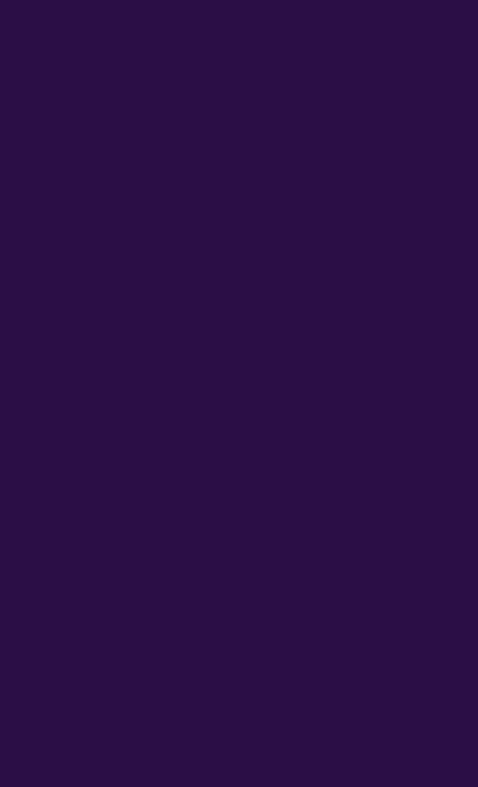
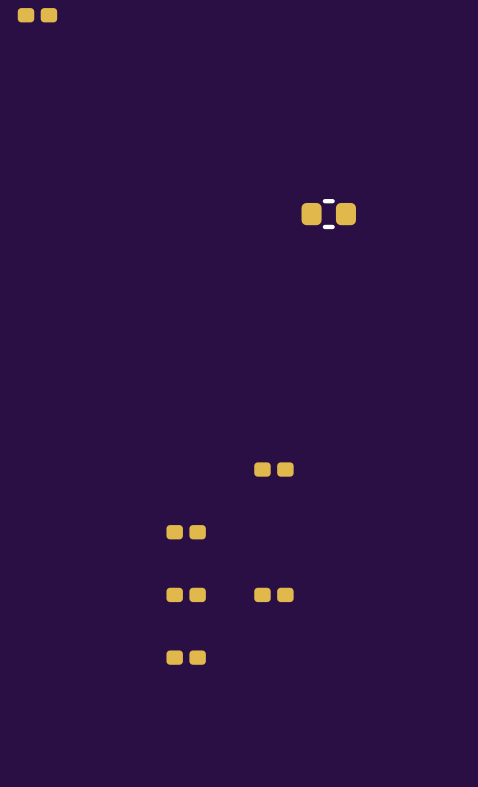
part: none -> (37, 15)
part: none -> (328, 214)
part: none -> (273, 469)
part: none -> (186, 532)
part: none -> (186, 594)
part: none -> (273, 594)
part: none -> (186, 657)

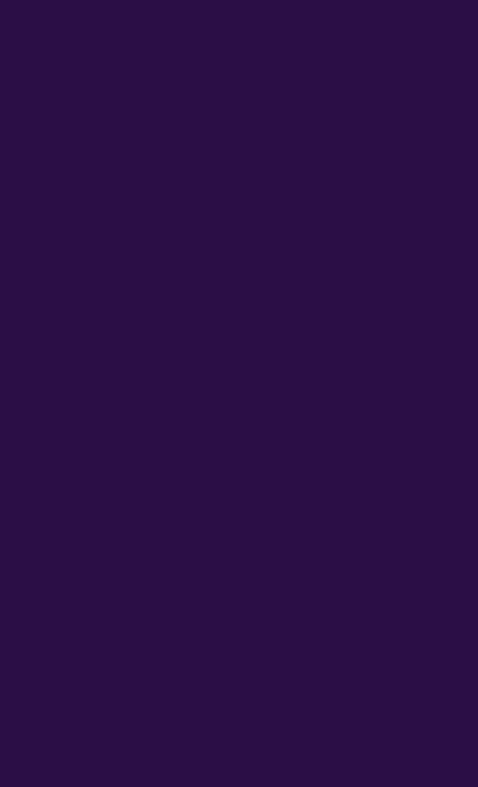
part: (37, 15) -> none
part: (328, 214) -> none
part: (273, 469) -> none
part: (186, 532) -> none
part: (186, 594) -> none
part: (273, 594) -> none
part: (186, 657) -> none

